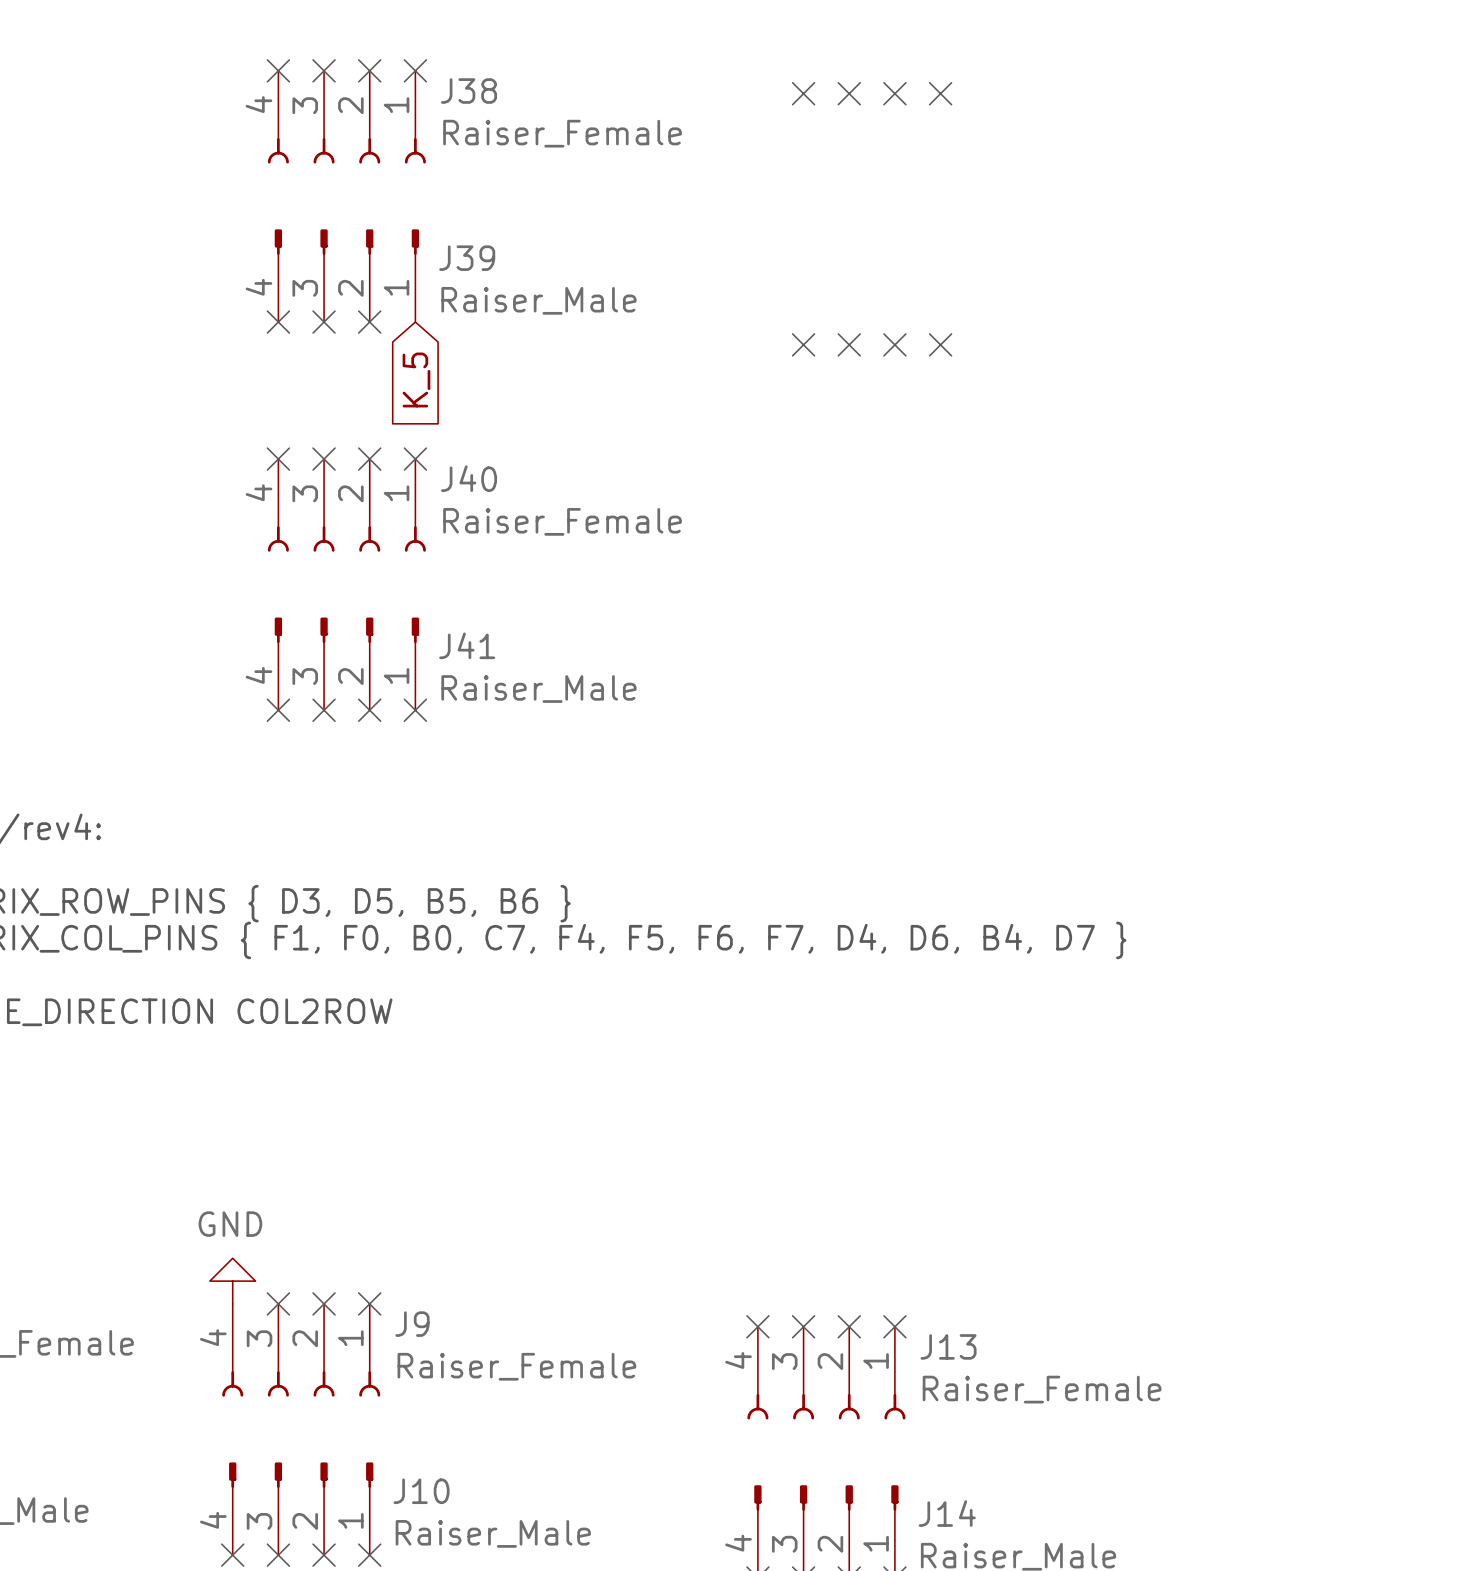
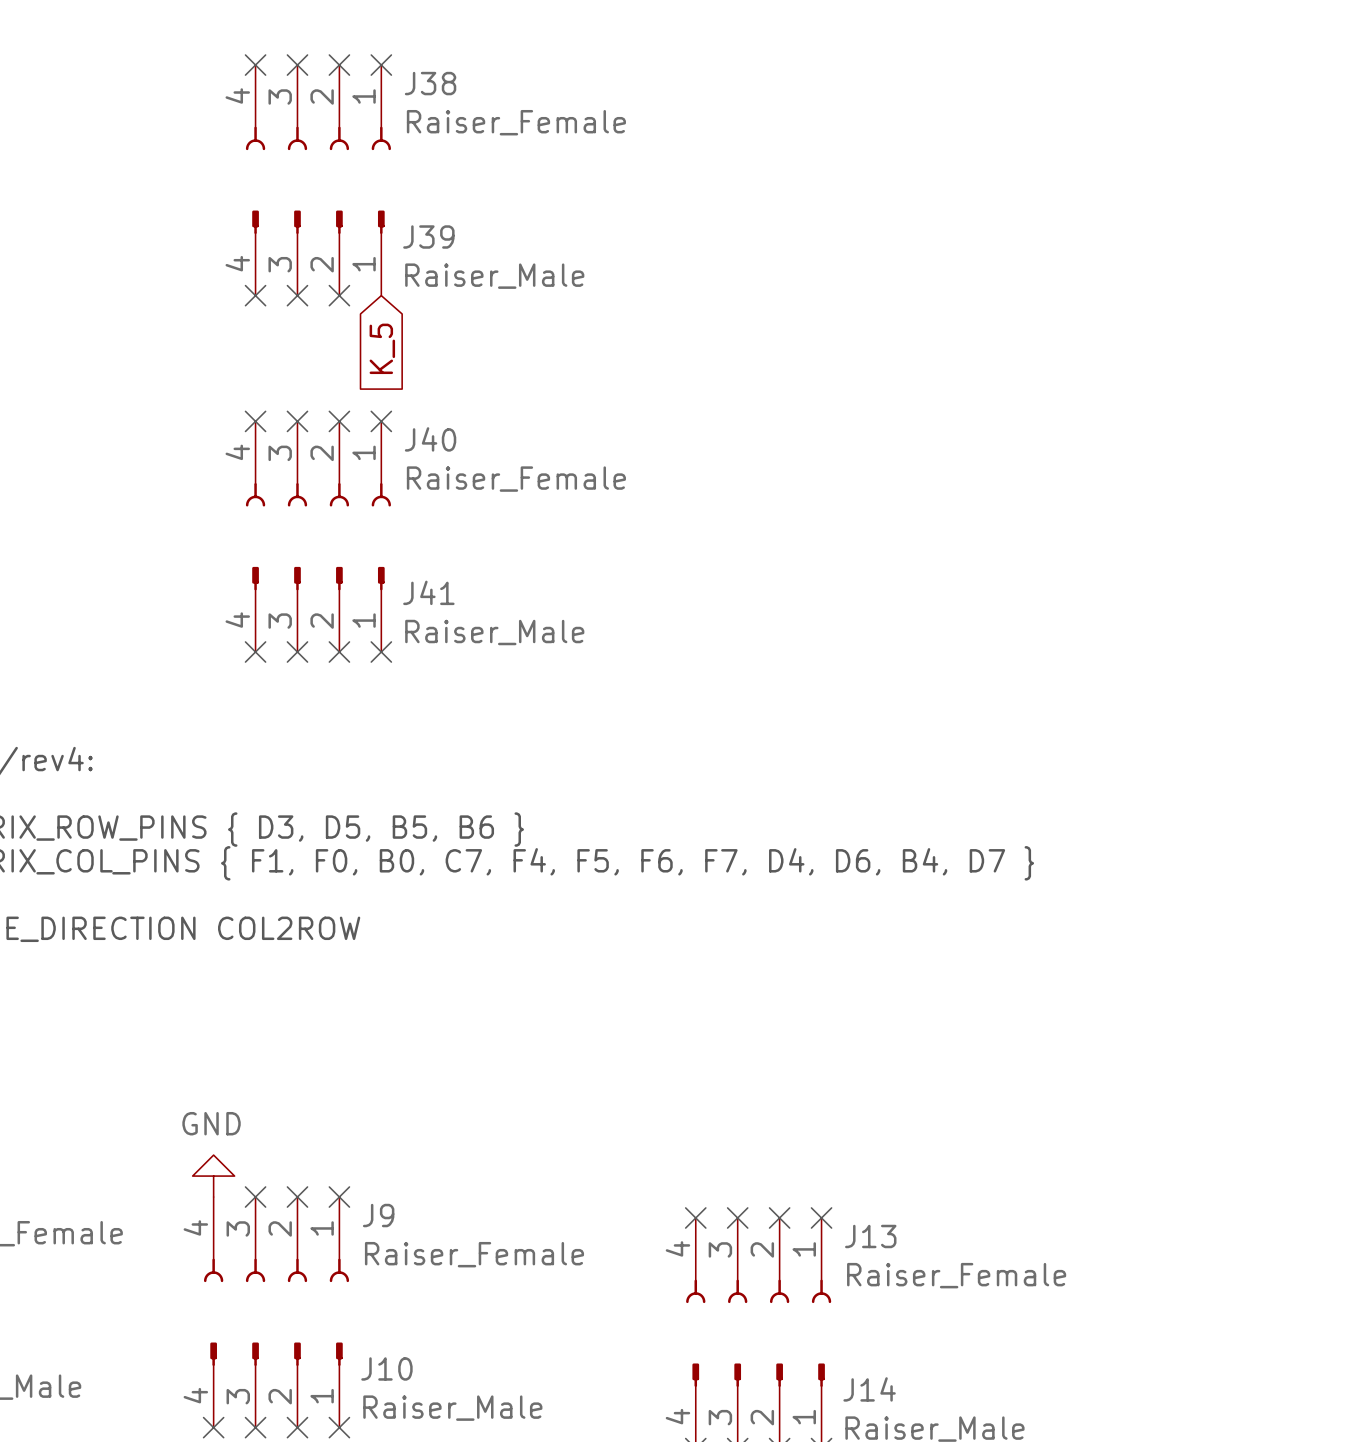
no-connect mark: (803, 93) -> none
no-connect mark: (849, 93) -> none
no-connect mark: (894, 93) -> none
no-connect mark: (940, 93) -> none
no-connect mark: (803, 344) -> none
no-connect mark: (849, 344) -> none
no-connect mark: (894, 344) -> none
no-connect mark: (940, 344) -> none

